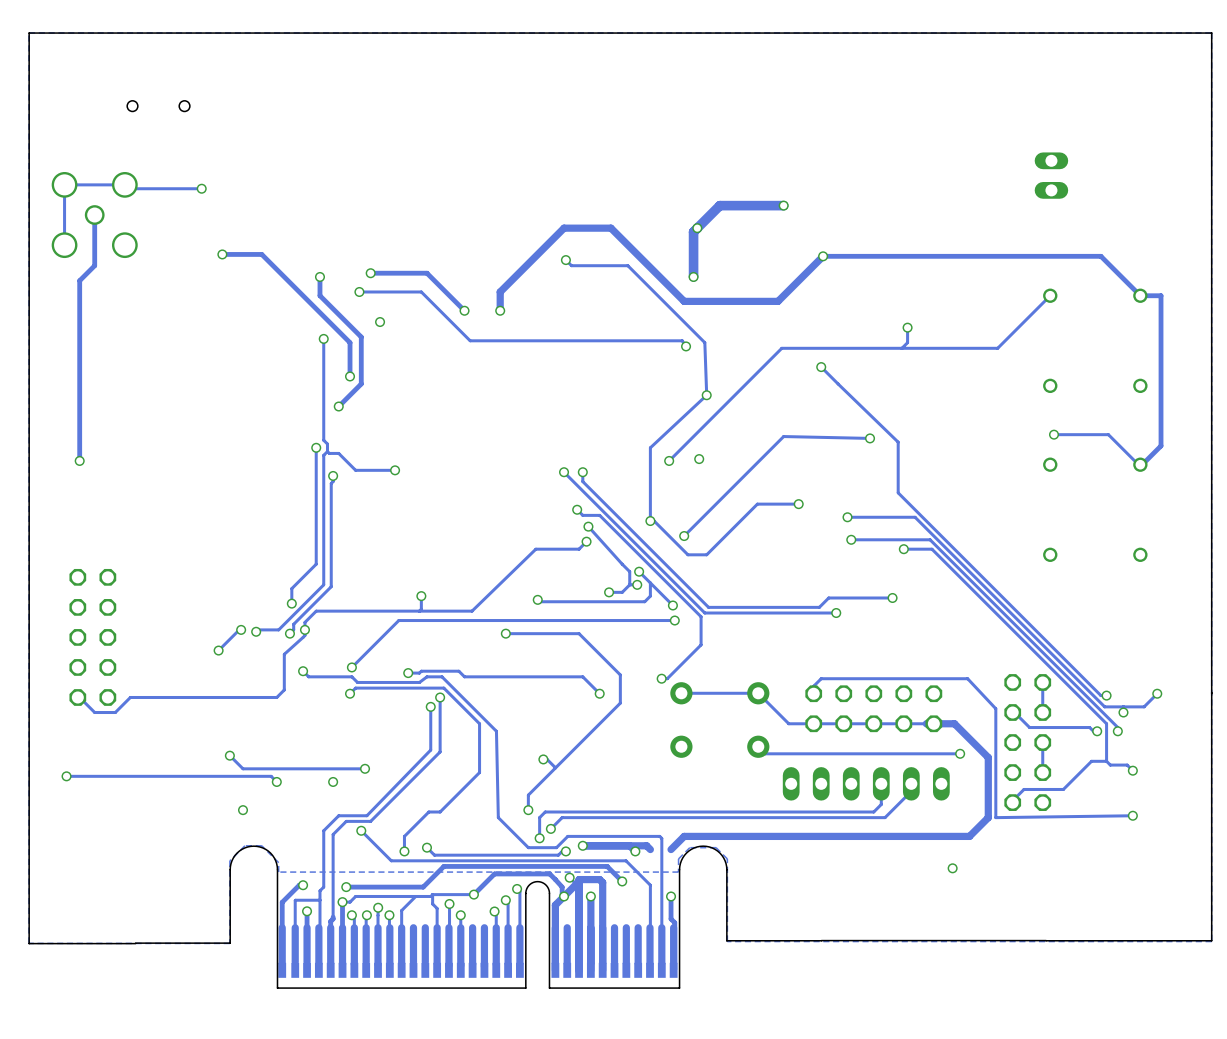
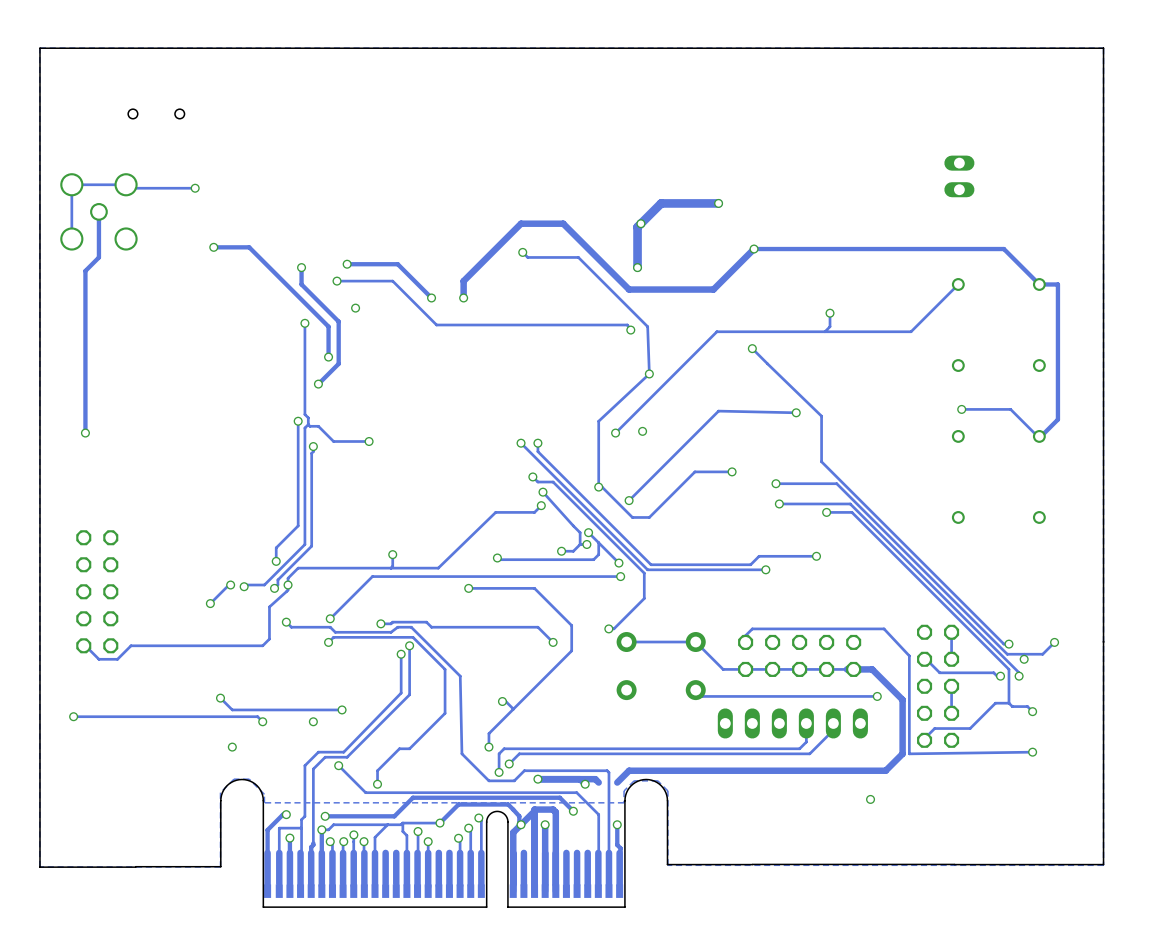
track: (426, 847) (434, 855) (558, 855) (562, 851) (565, 851) -> none
via: (426, 847) -> none
via: (565, 851) -> none
via: (569, 877) -> none

